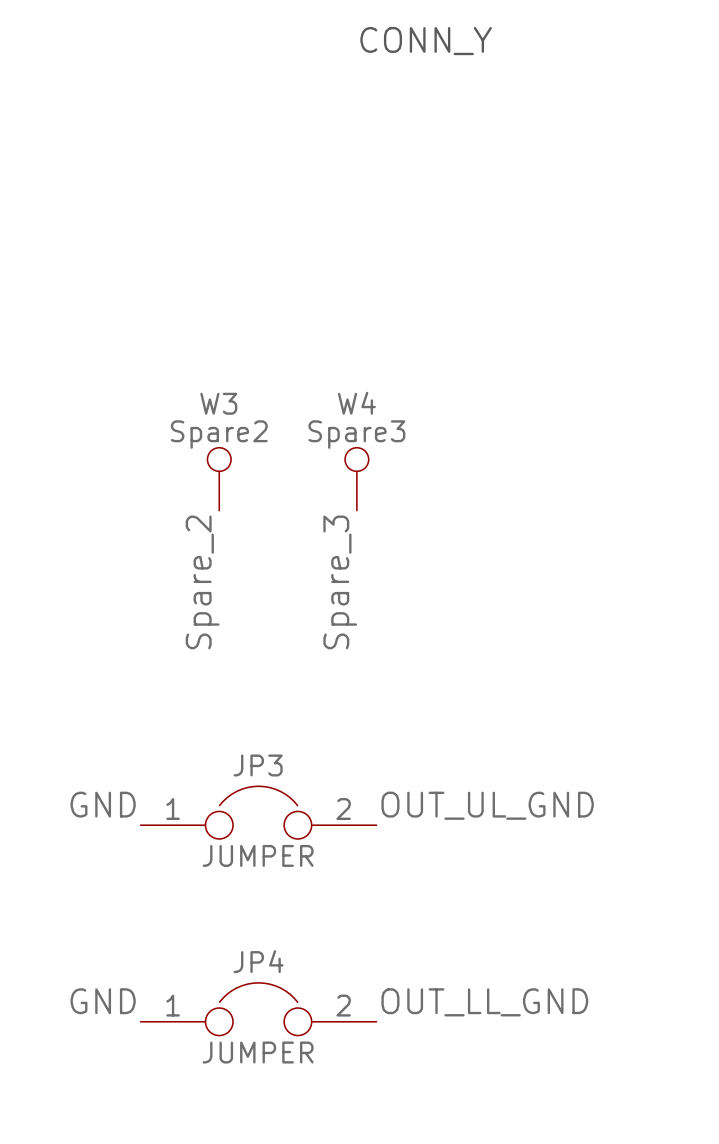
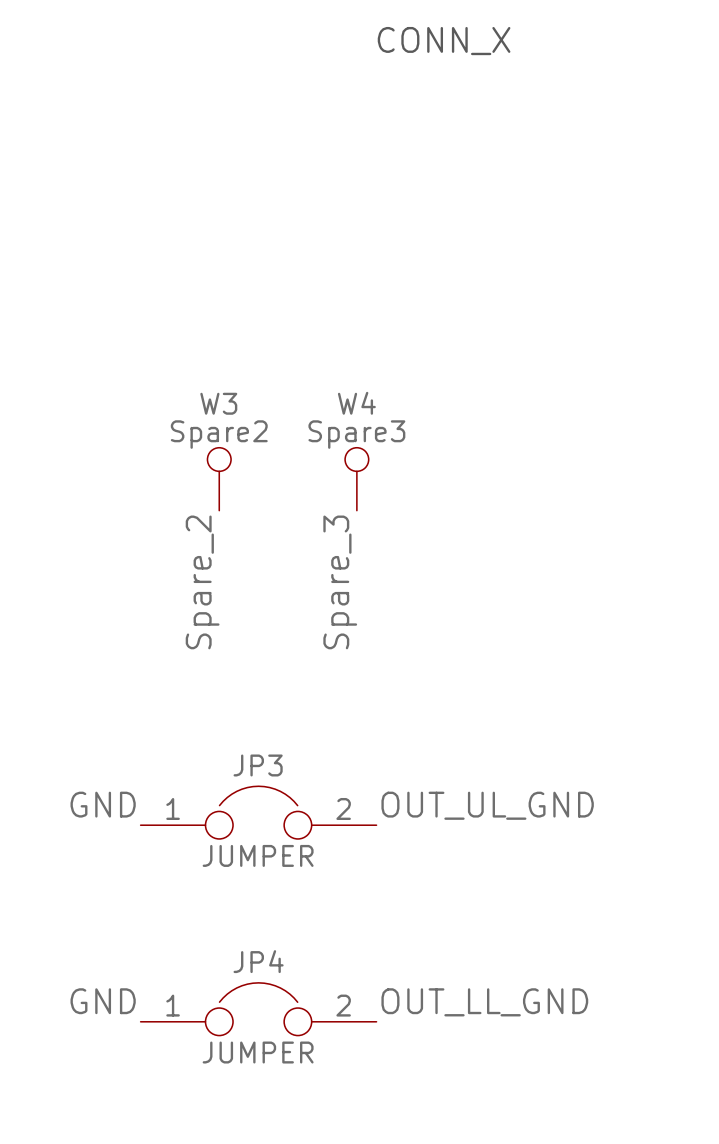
text: CONN_Y (426, 41) -> CONN_X (444, 41)

